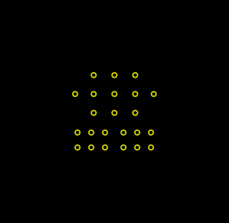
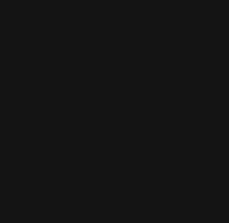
part: (114, 111) -> none

